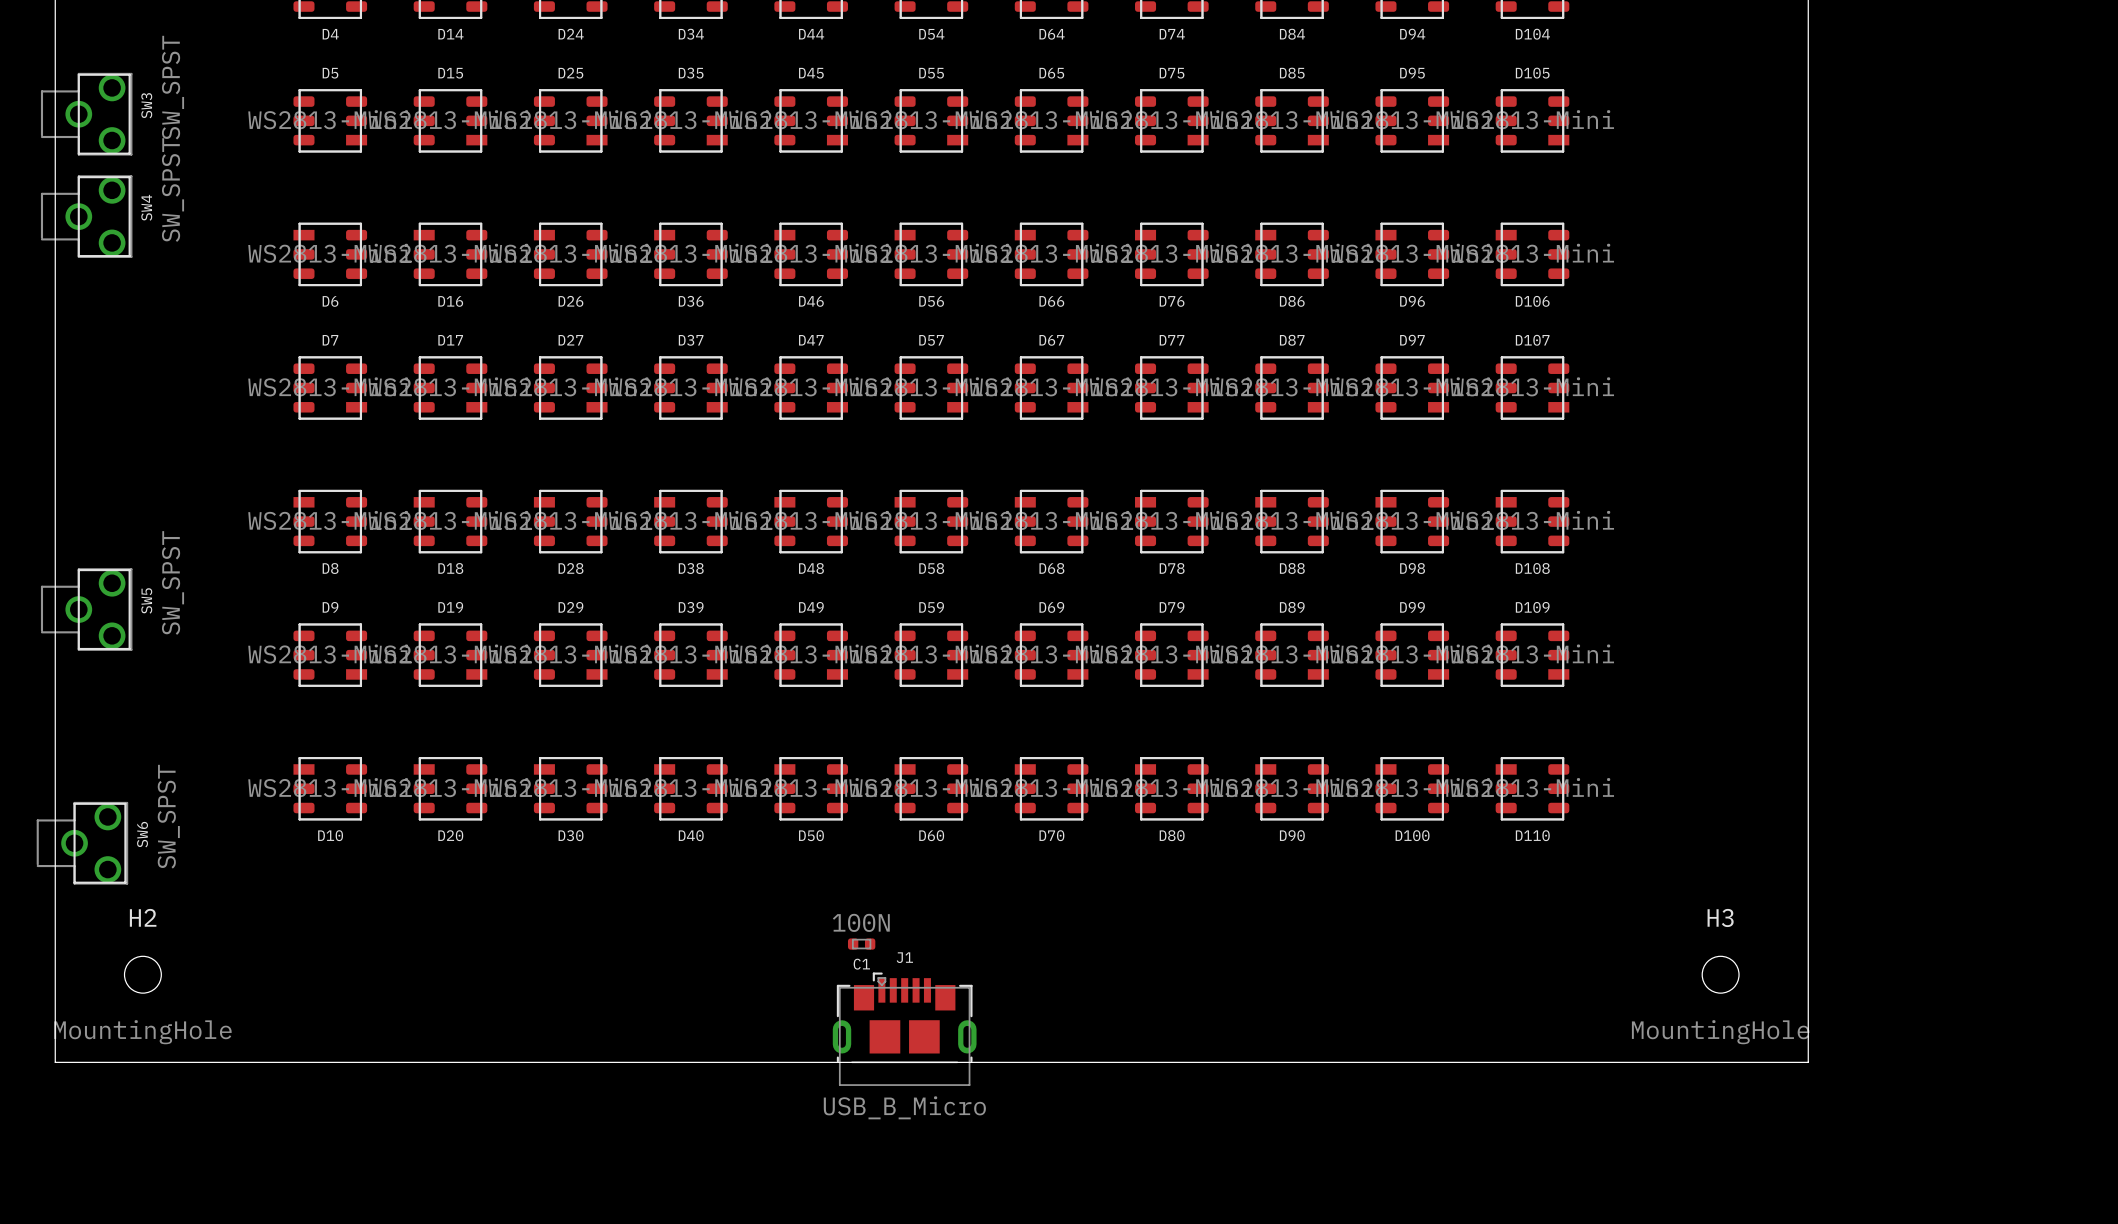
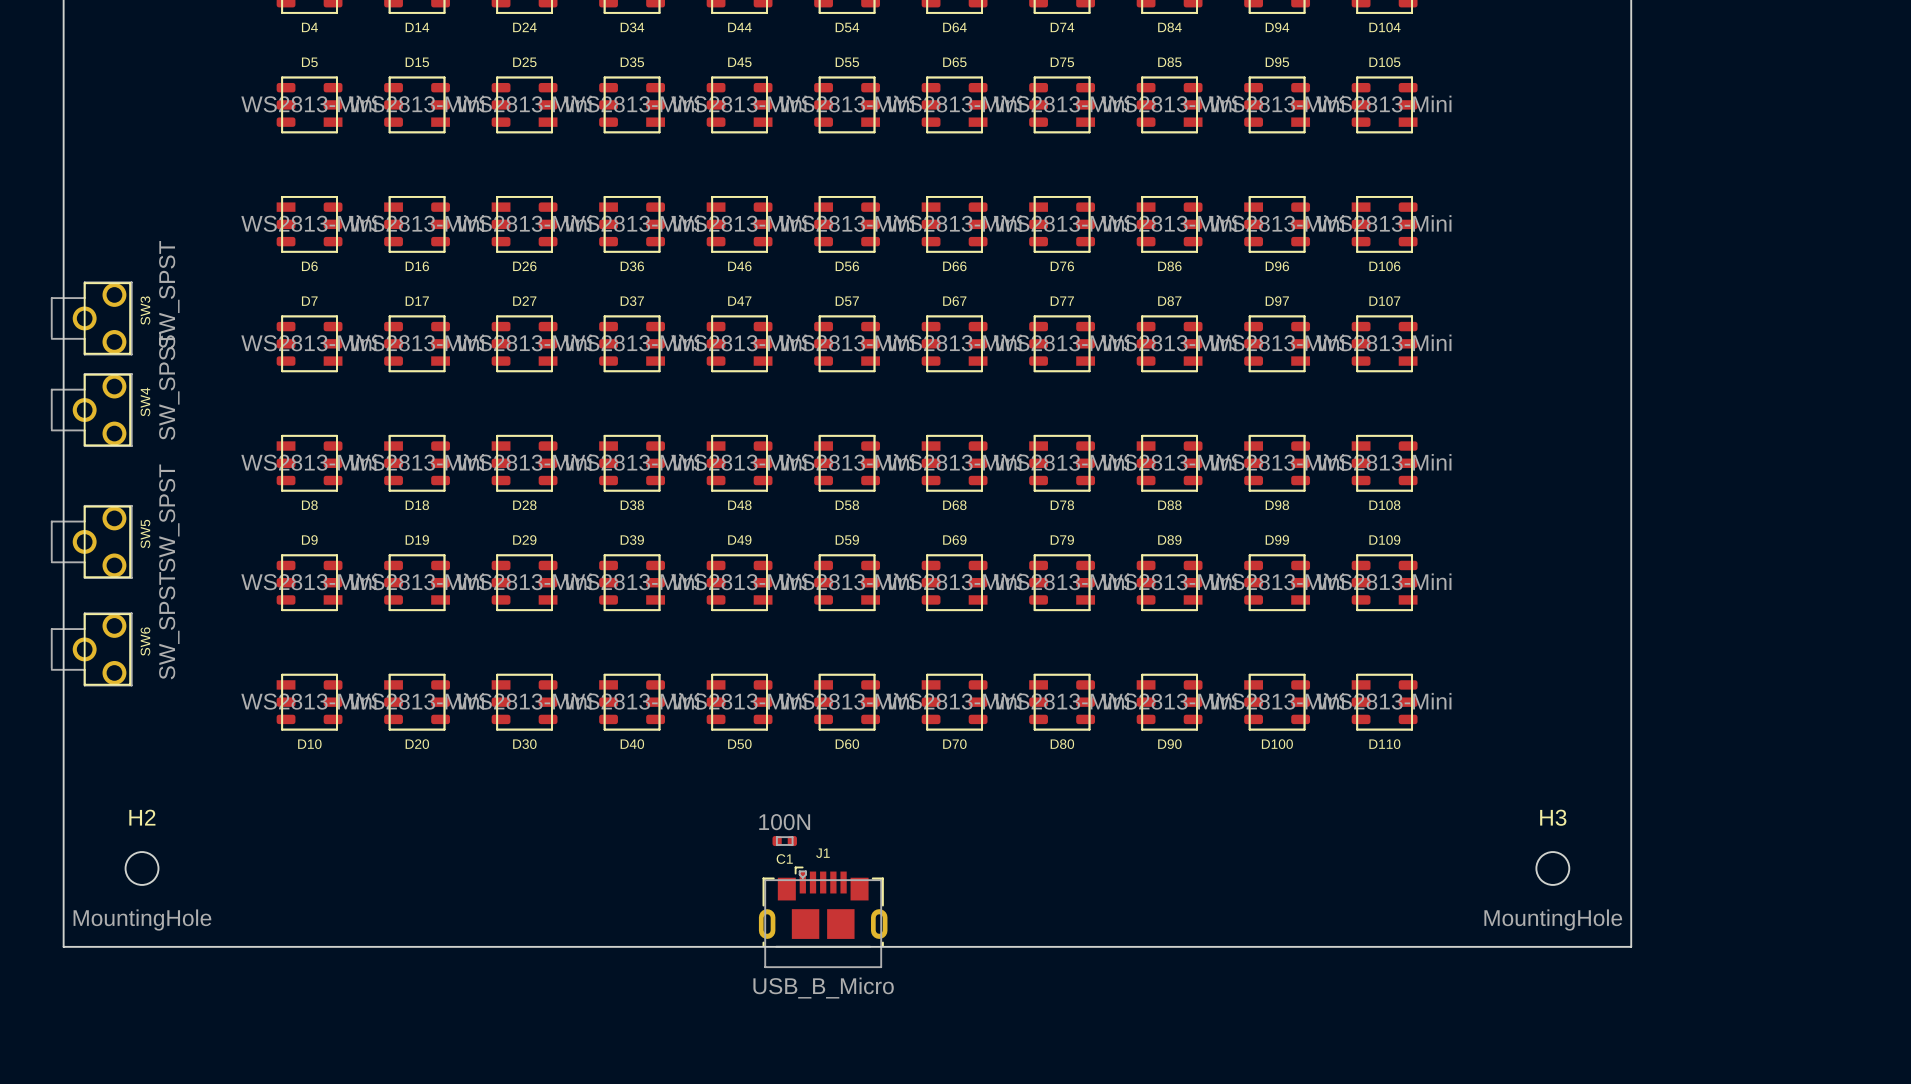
SW3 position: (86, 114) -> (91, 318)
SW4 position: (86, 216) -> (91, 410)
SW6 position: (82, 843) -> (91, 649)

